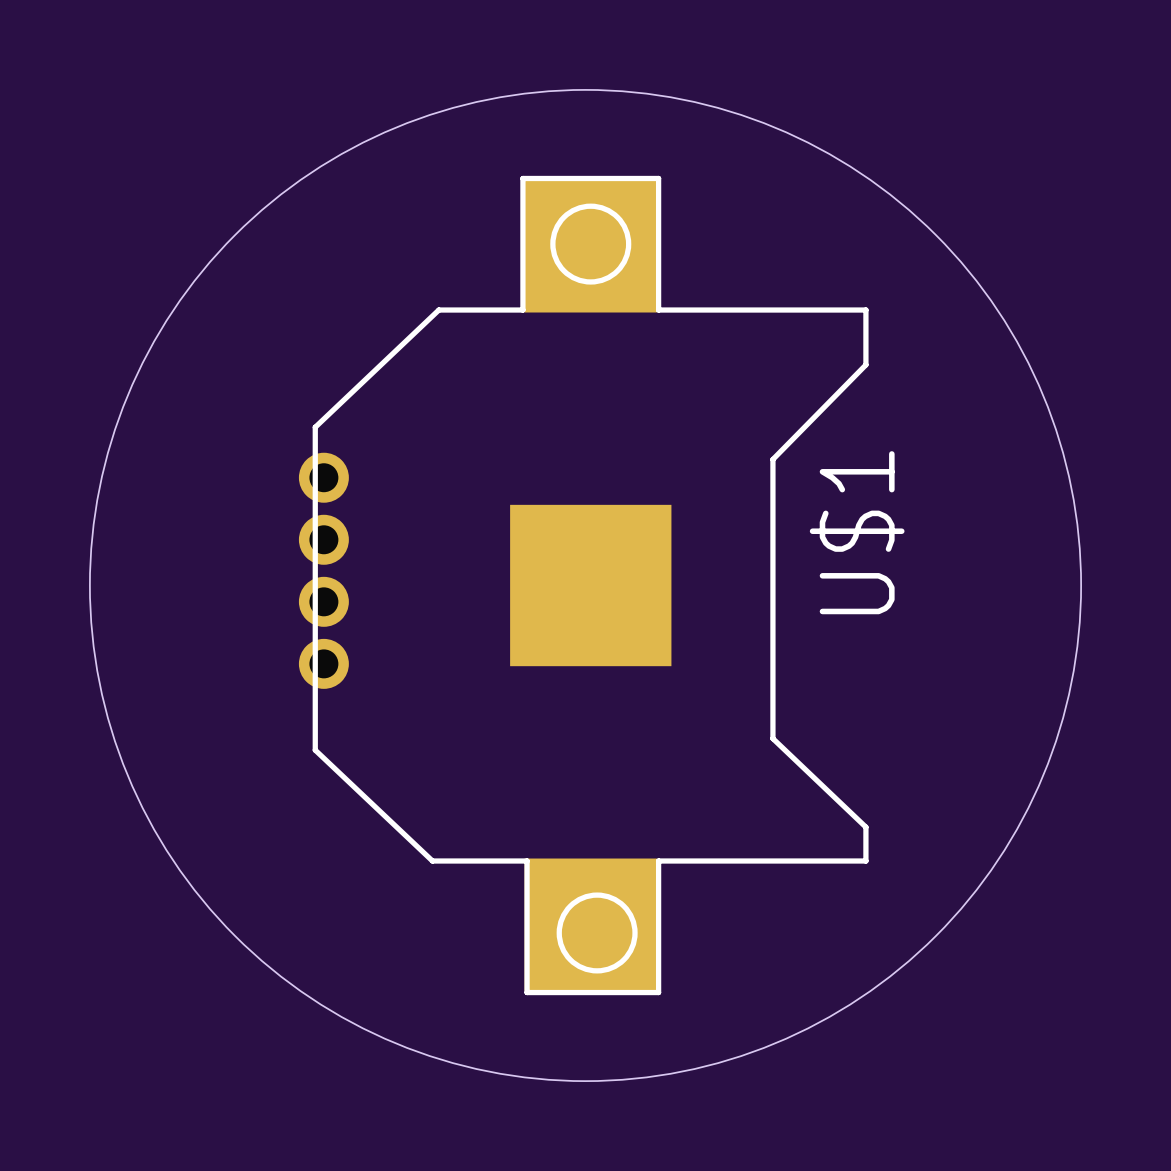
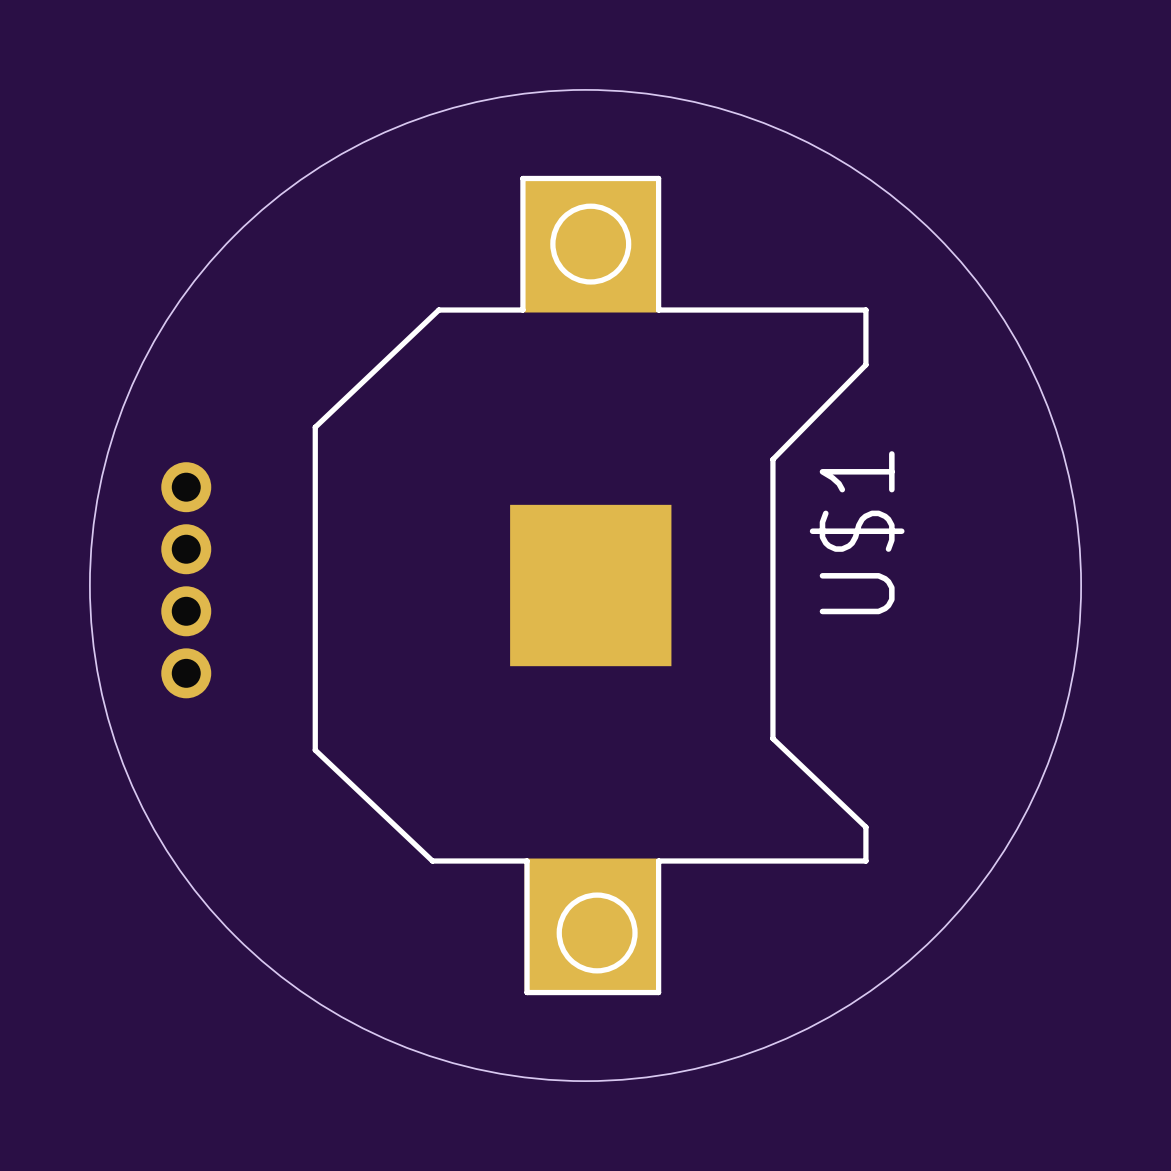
part position: (323, 570) -> (186, 580)

